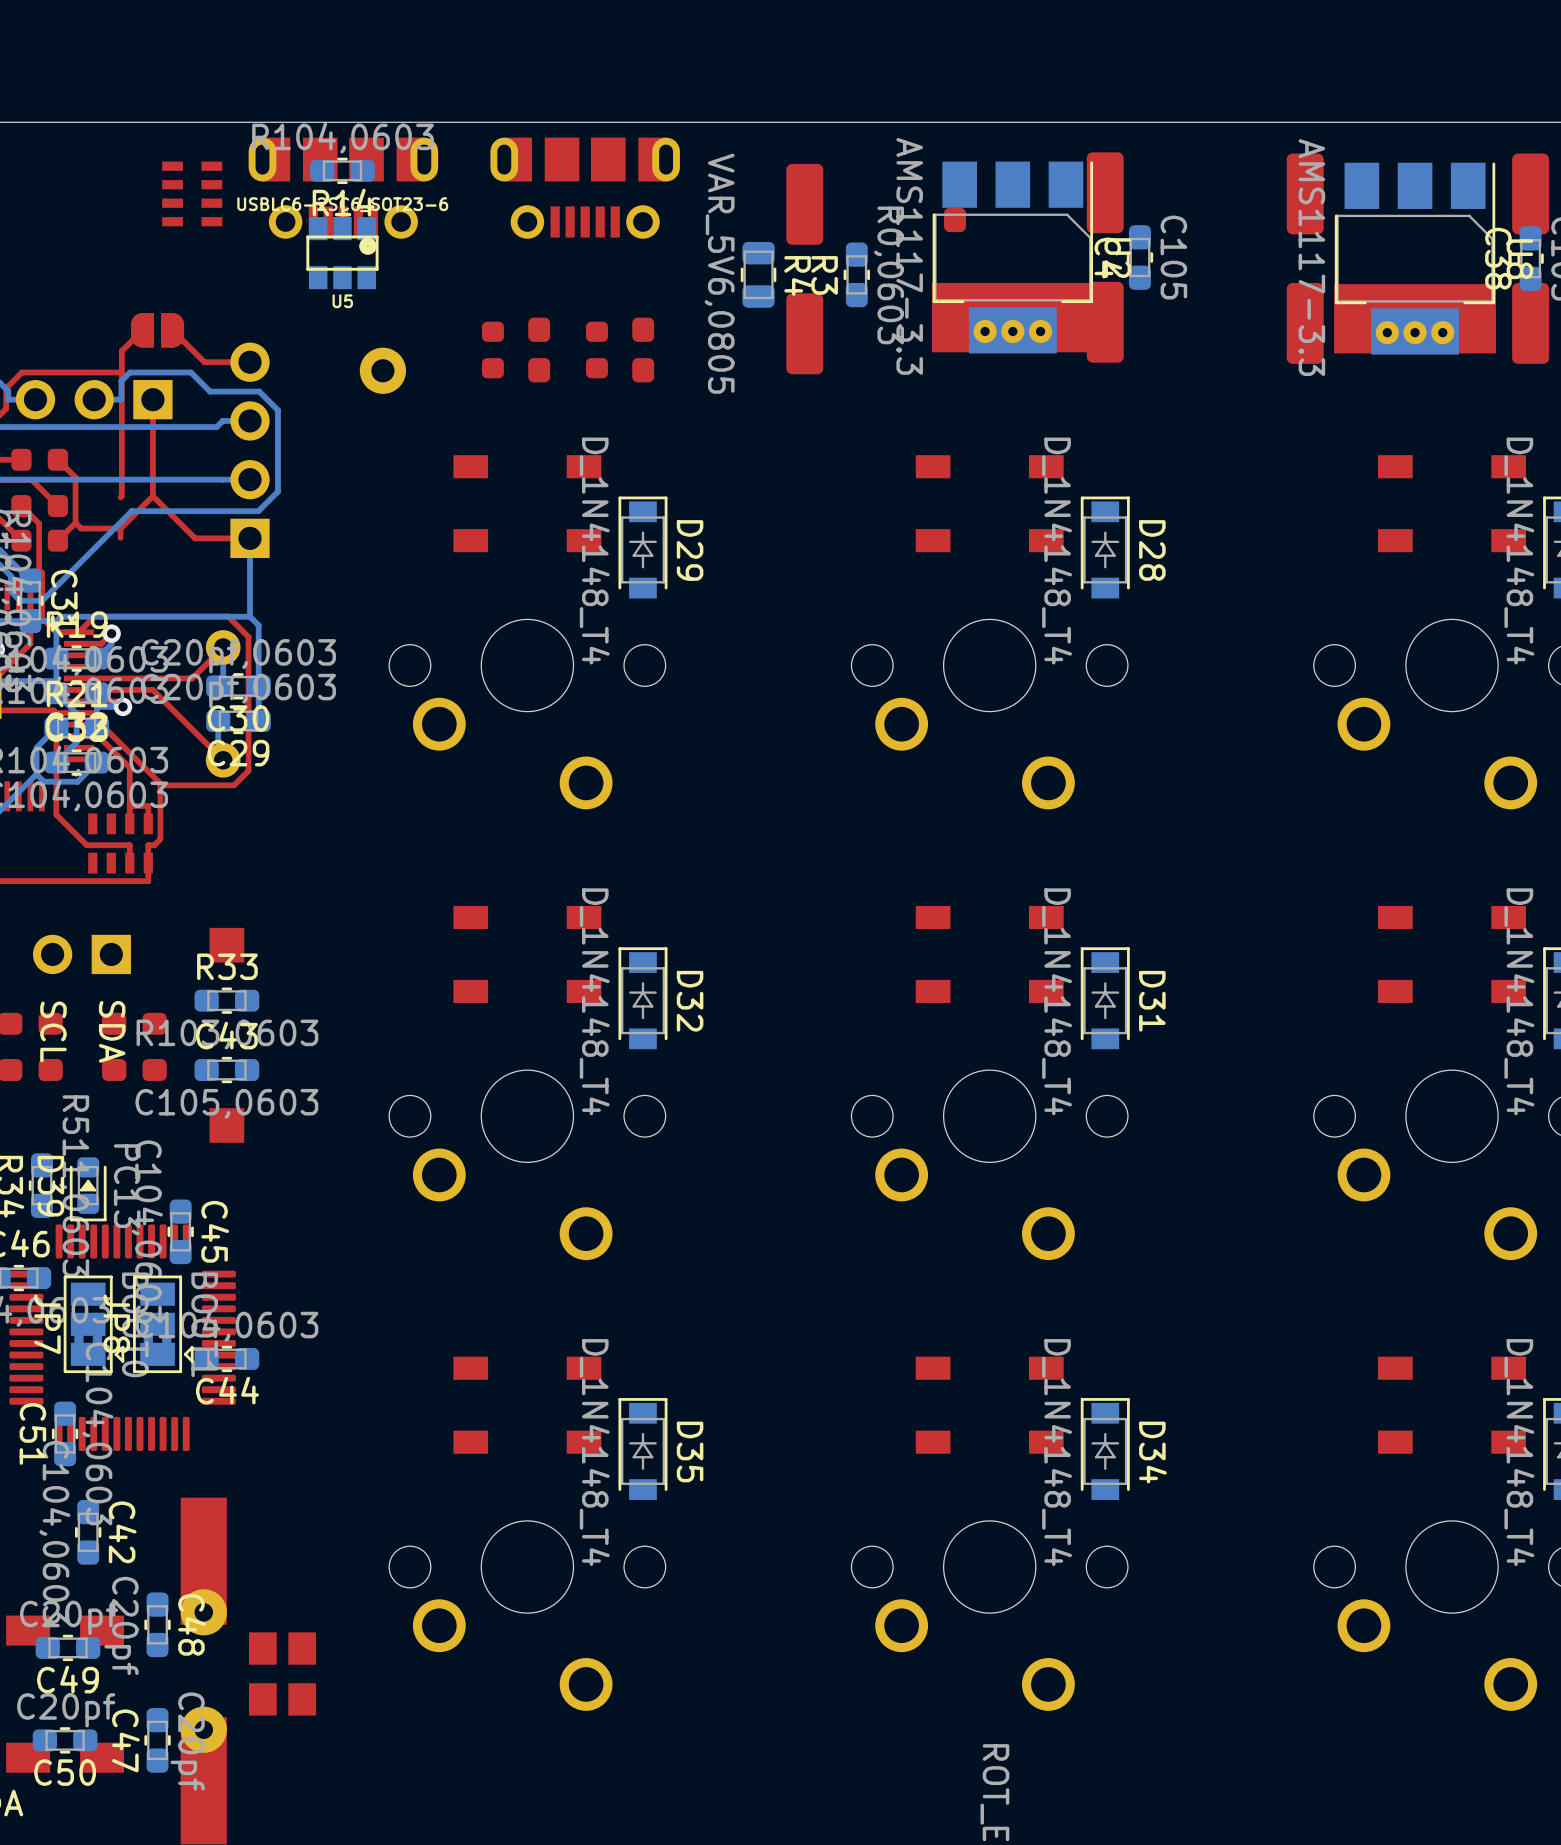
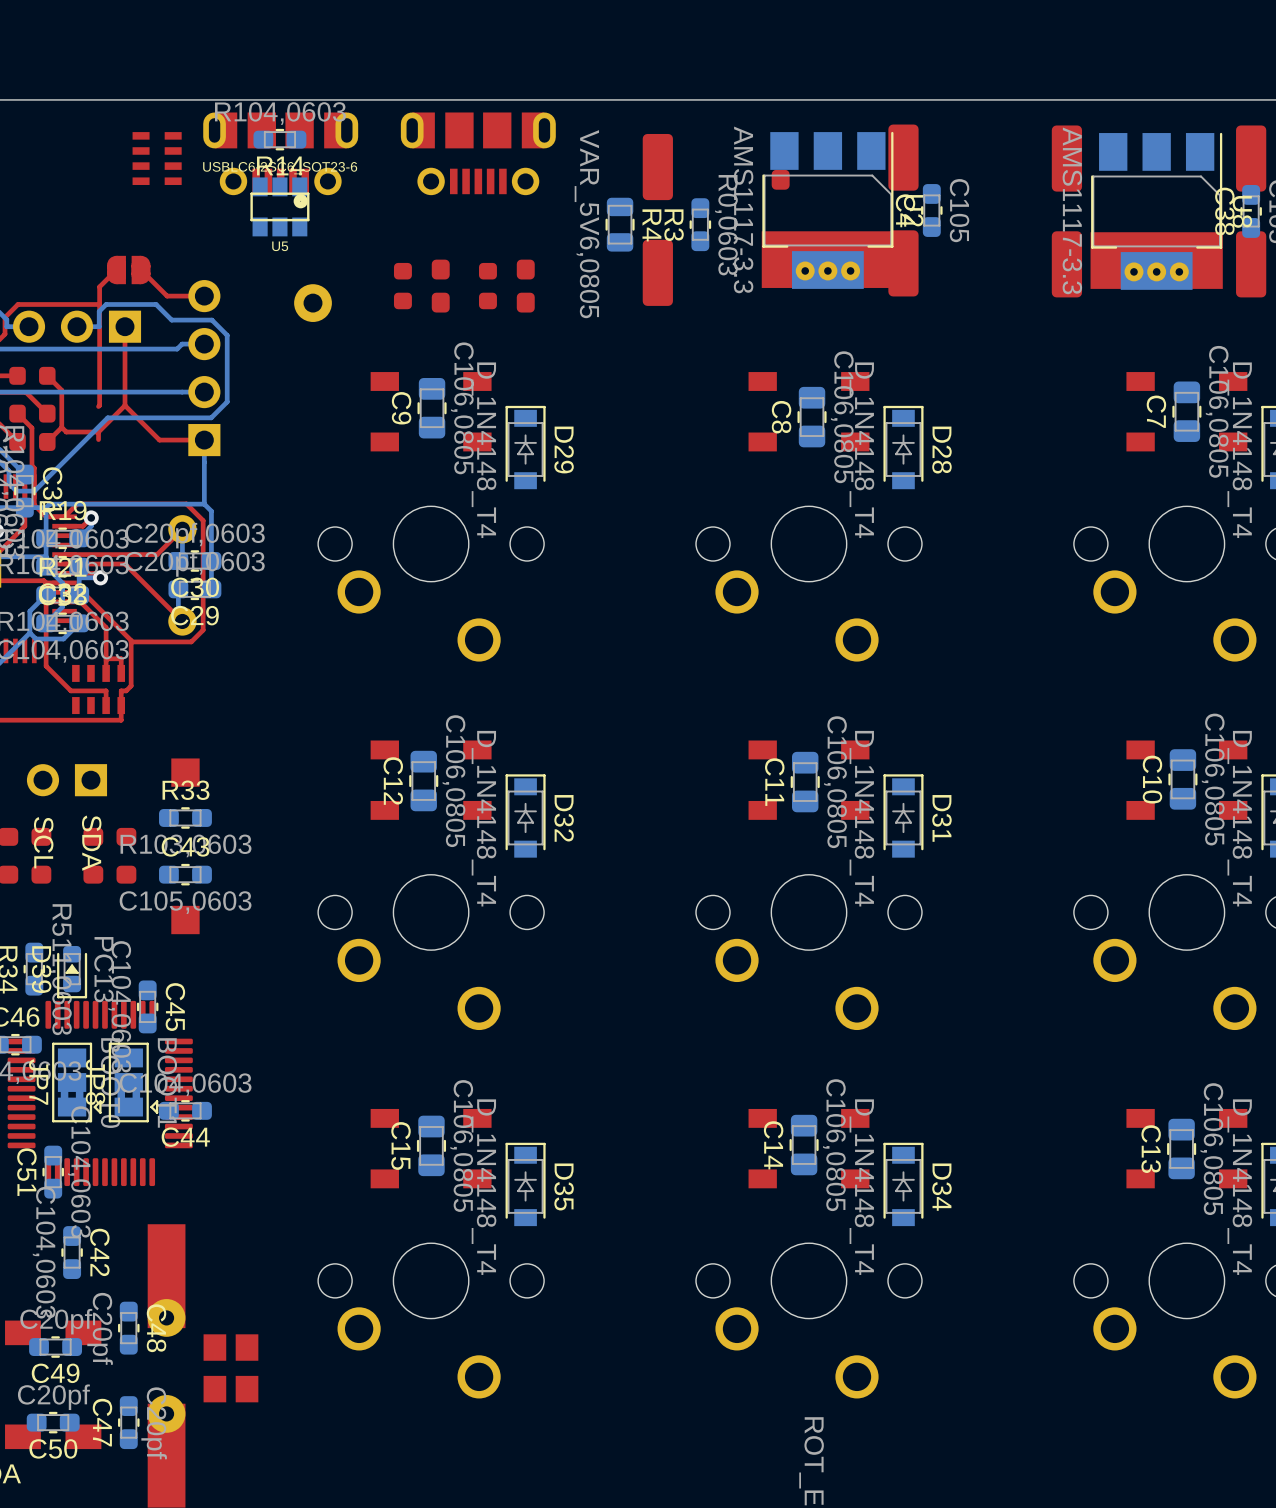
C9: none -> C106,0805 (432, 408)
C7: none -> C106,0805 (1186, 411)
C8: none -> C106,0805 (812, 417)
C10: none -> C106,0805 (1182, 779)
C12: none -> C106,0805 (423, 781)
C11: none -> C106,0805 (805, 782)
C14: none -> C106,0805 (804, 1145)
C15: none -> C106,0805 (431, 1145)
C13: none -> C106,0805 (1181, 1149)

